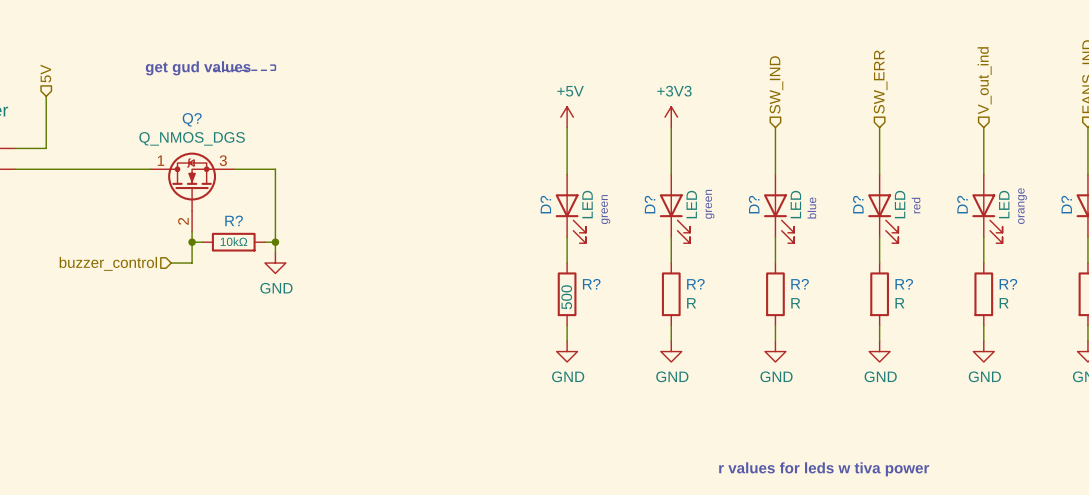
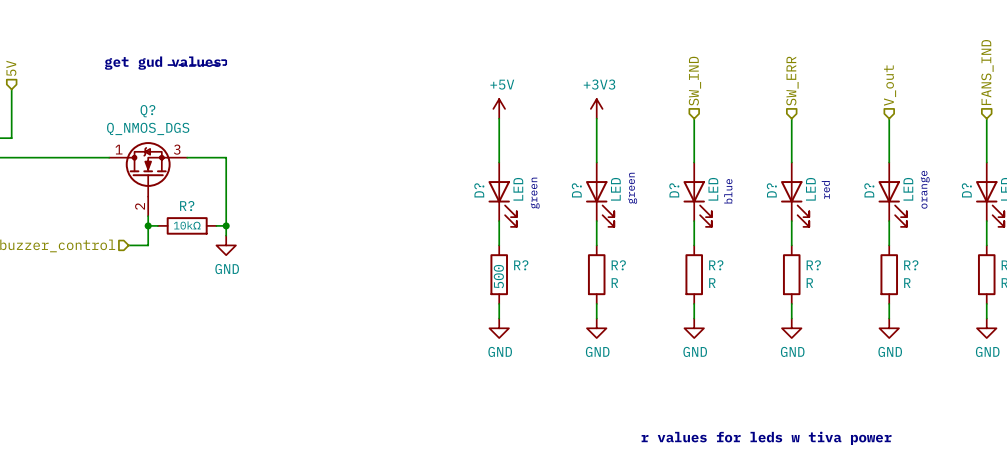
hierarchical label: V_out_ind (984, 80) -> V_out (890, 85)

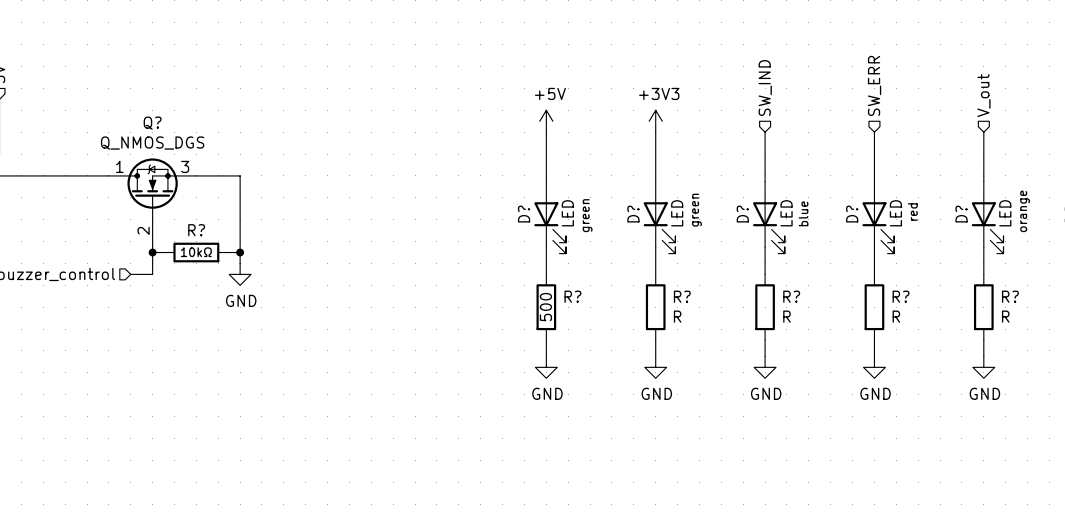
line: (221, 60) (226, 60) (226, 65) (167, 65) -> none
text: get gud values (162, 63) -> none
text: r values for leds w tiva power (766, 438) -> none

